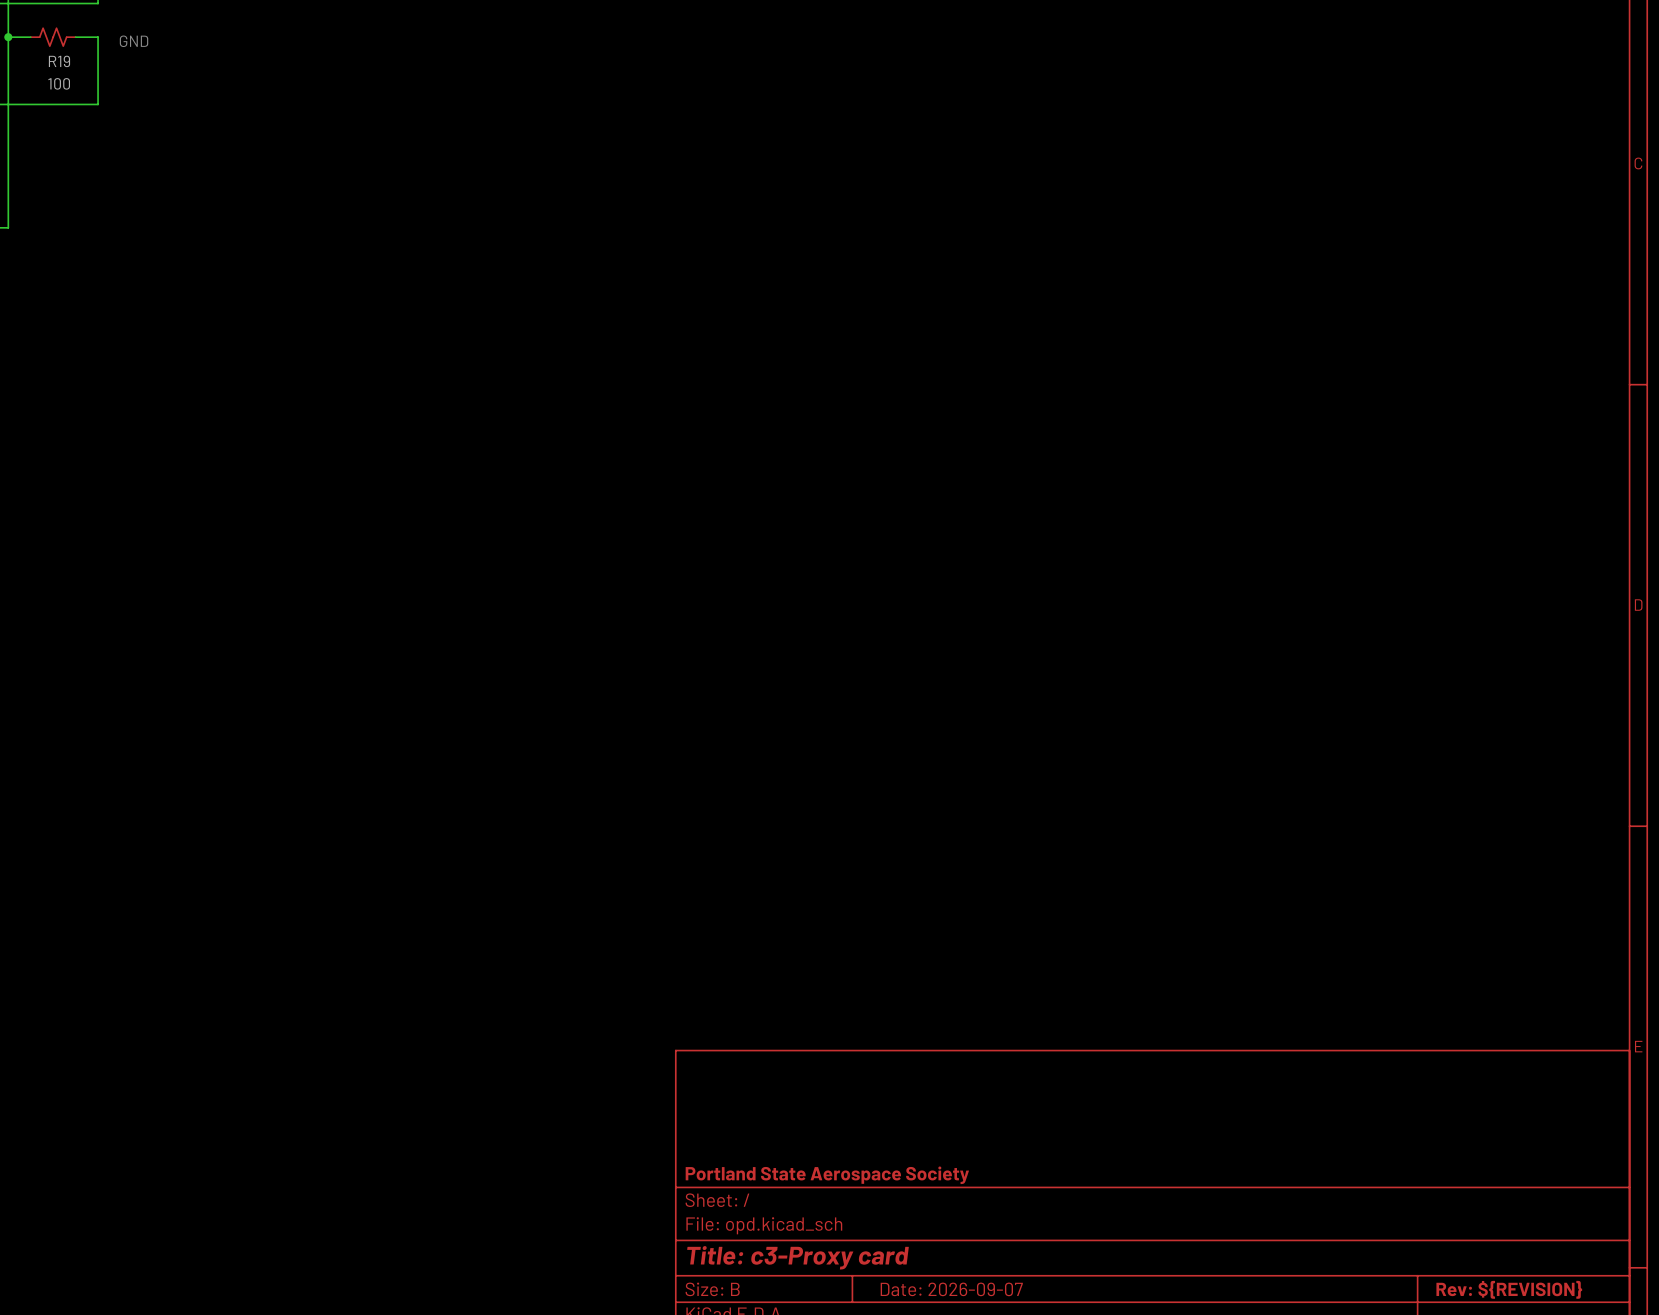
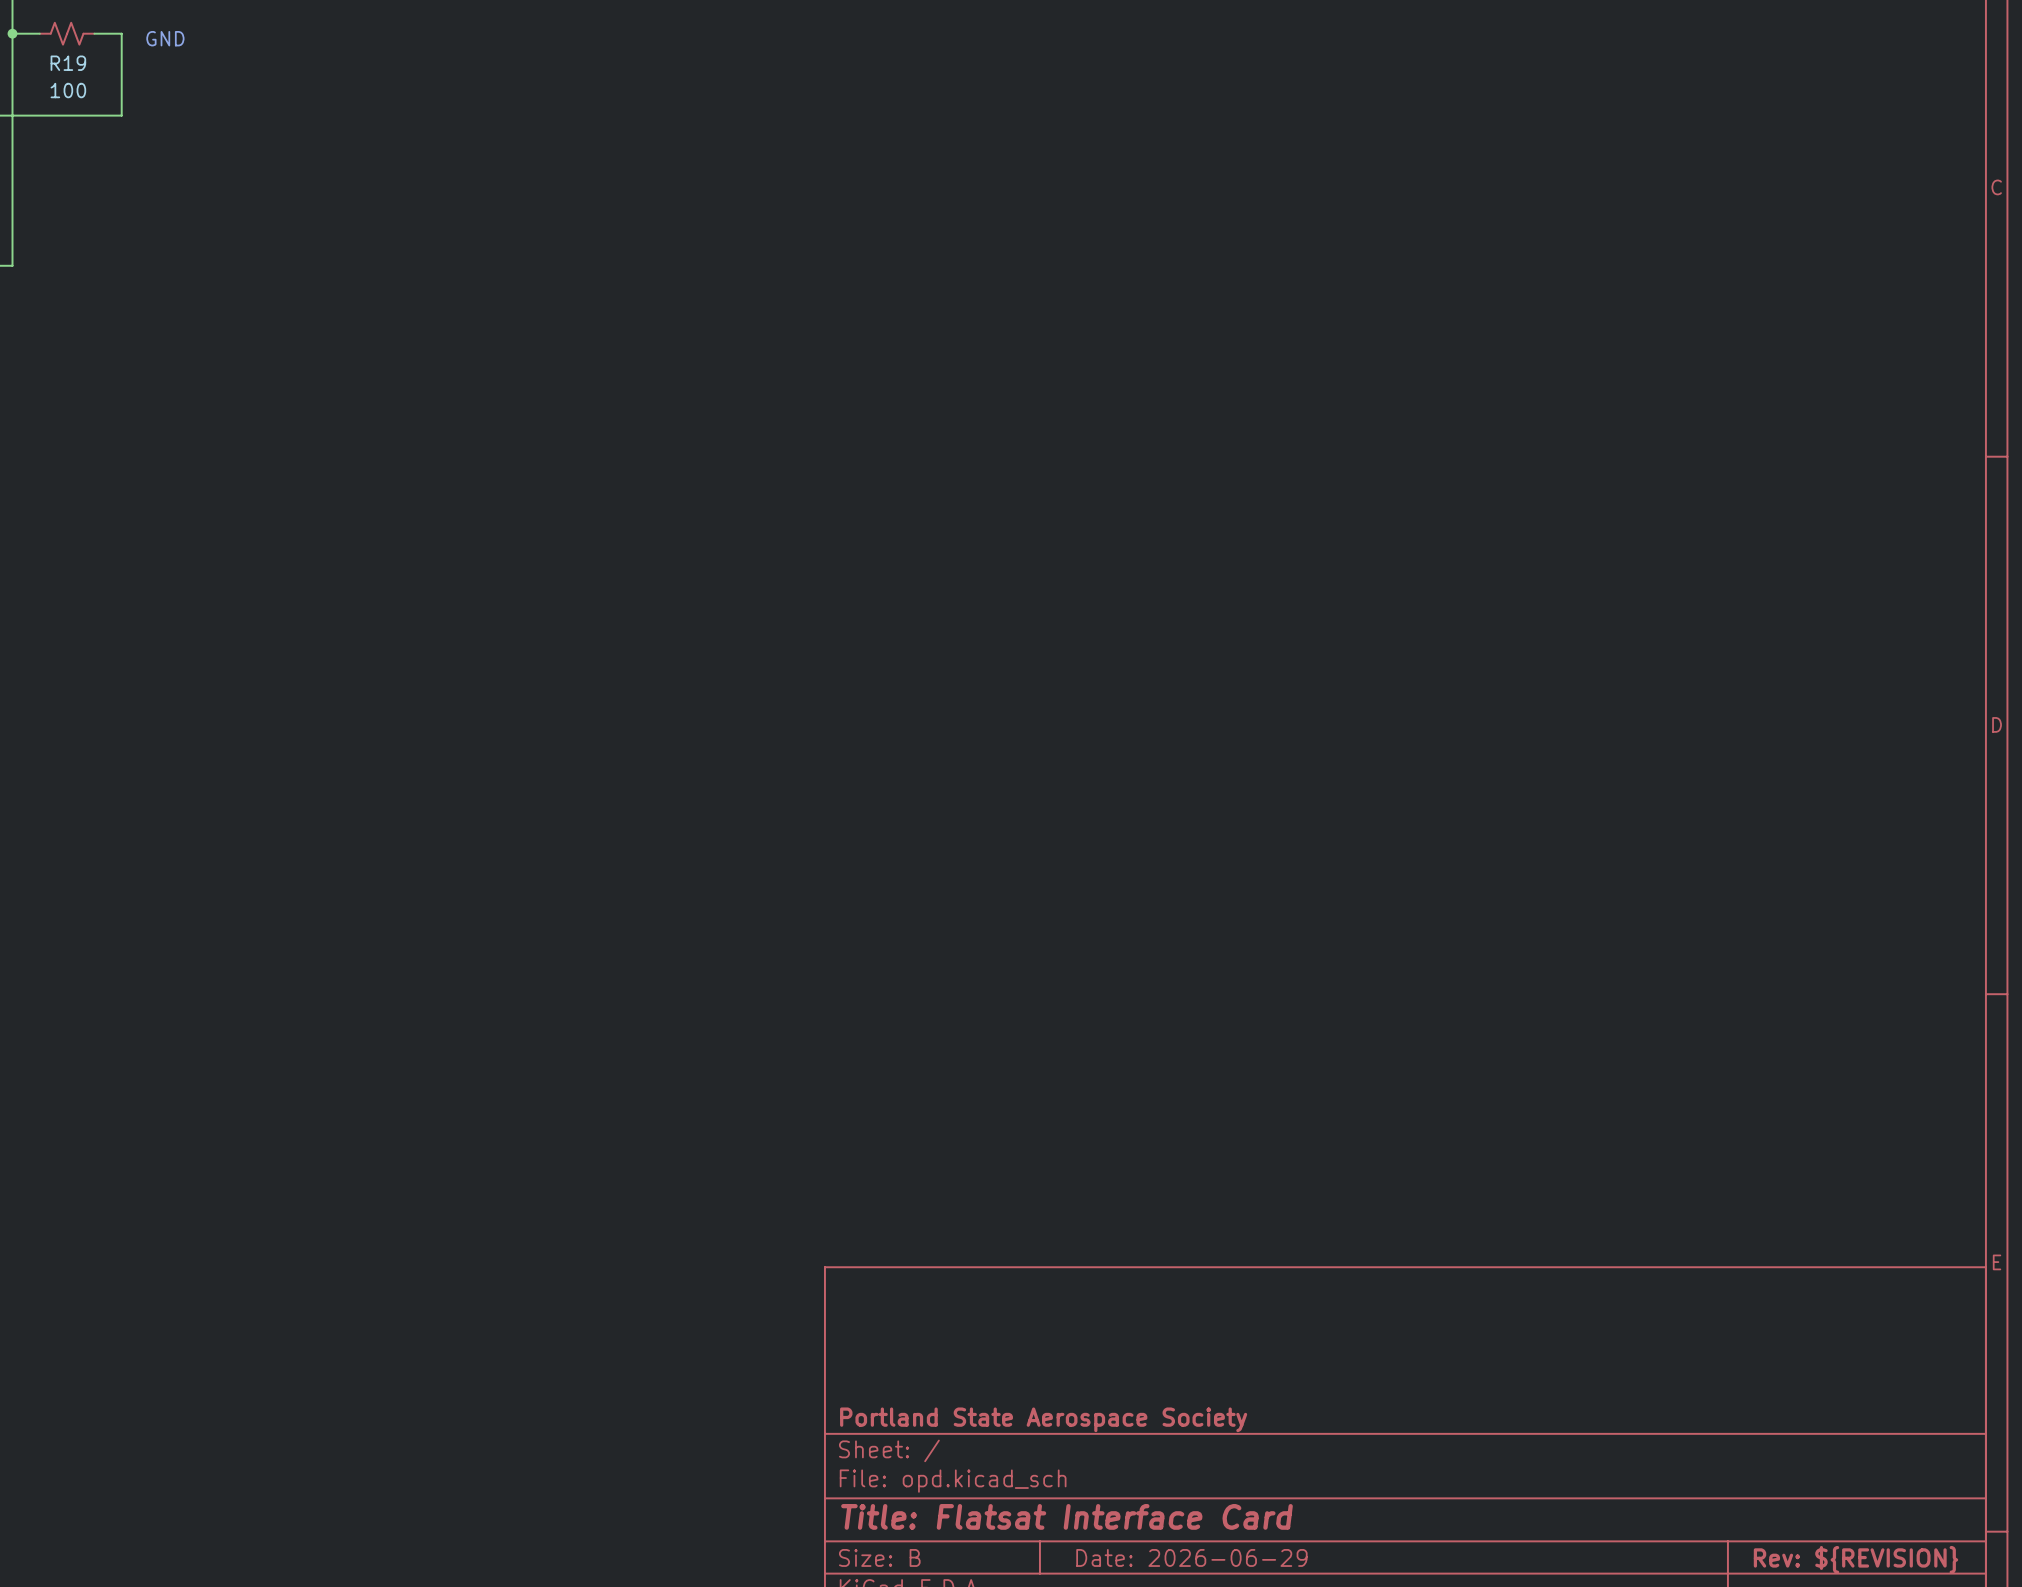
title block: Title: c3-Proxy card (797, 1257) -> Title: Flatsat Interface Card (1066, 1516)
title block: Date: 2026-09-07 (951, 1289) -> Date: 2026-06-29 (1191, 1557)

